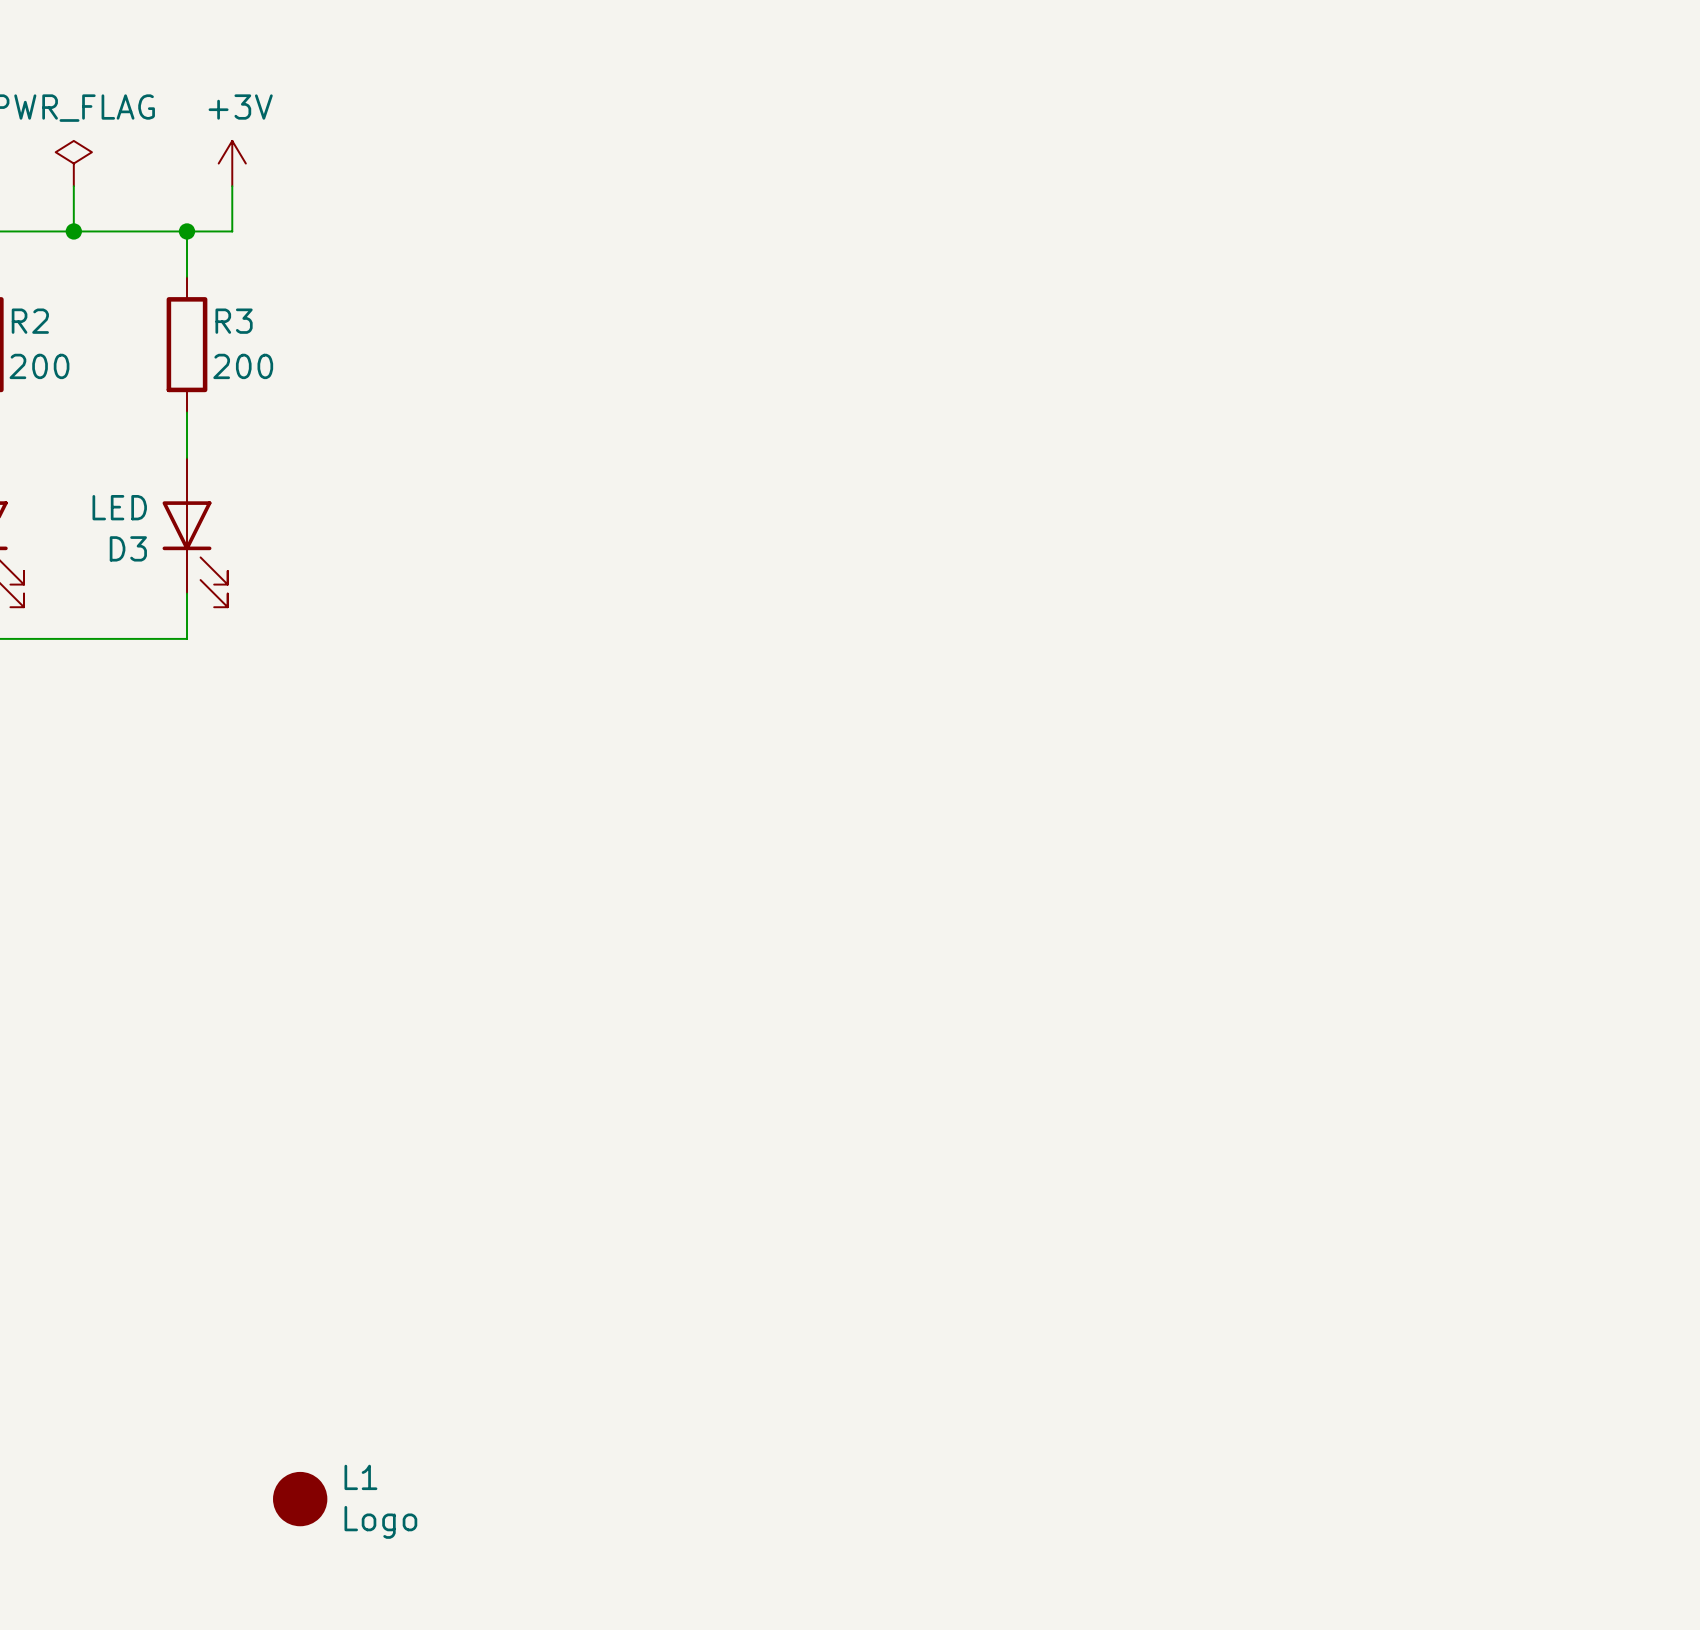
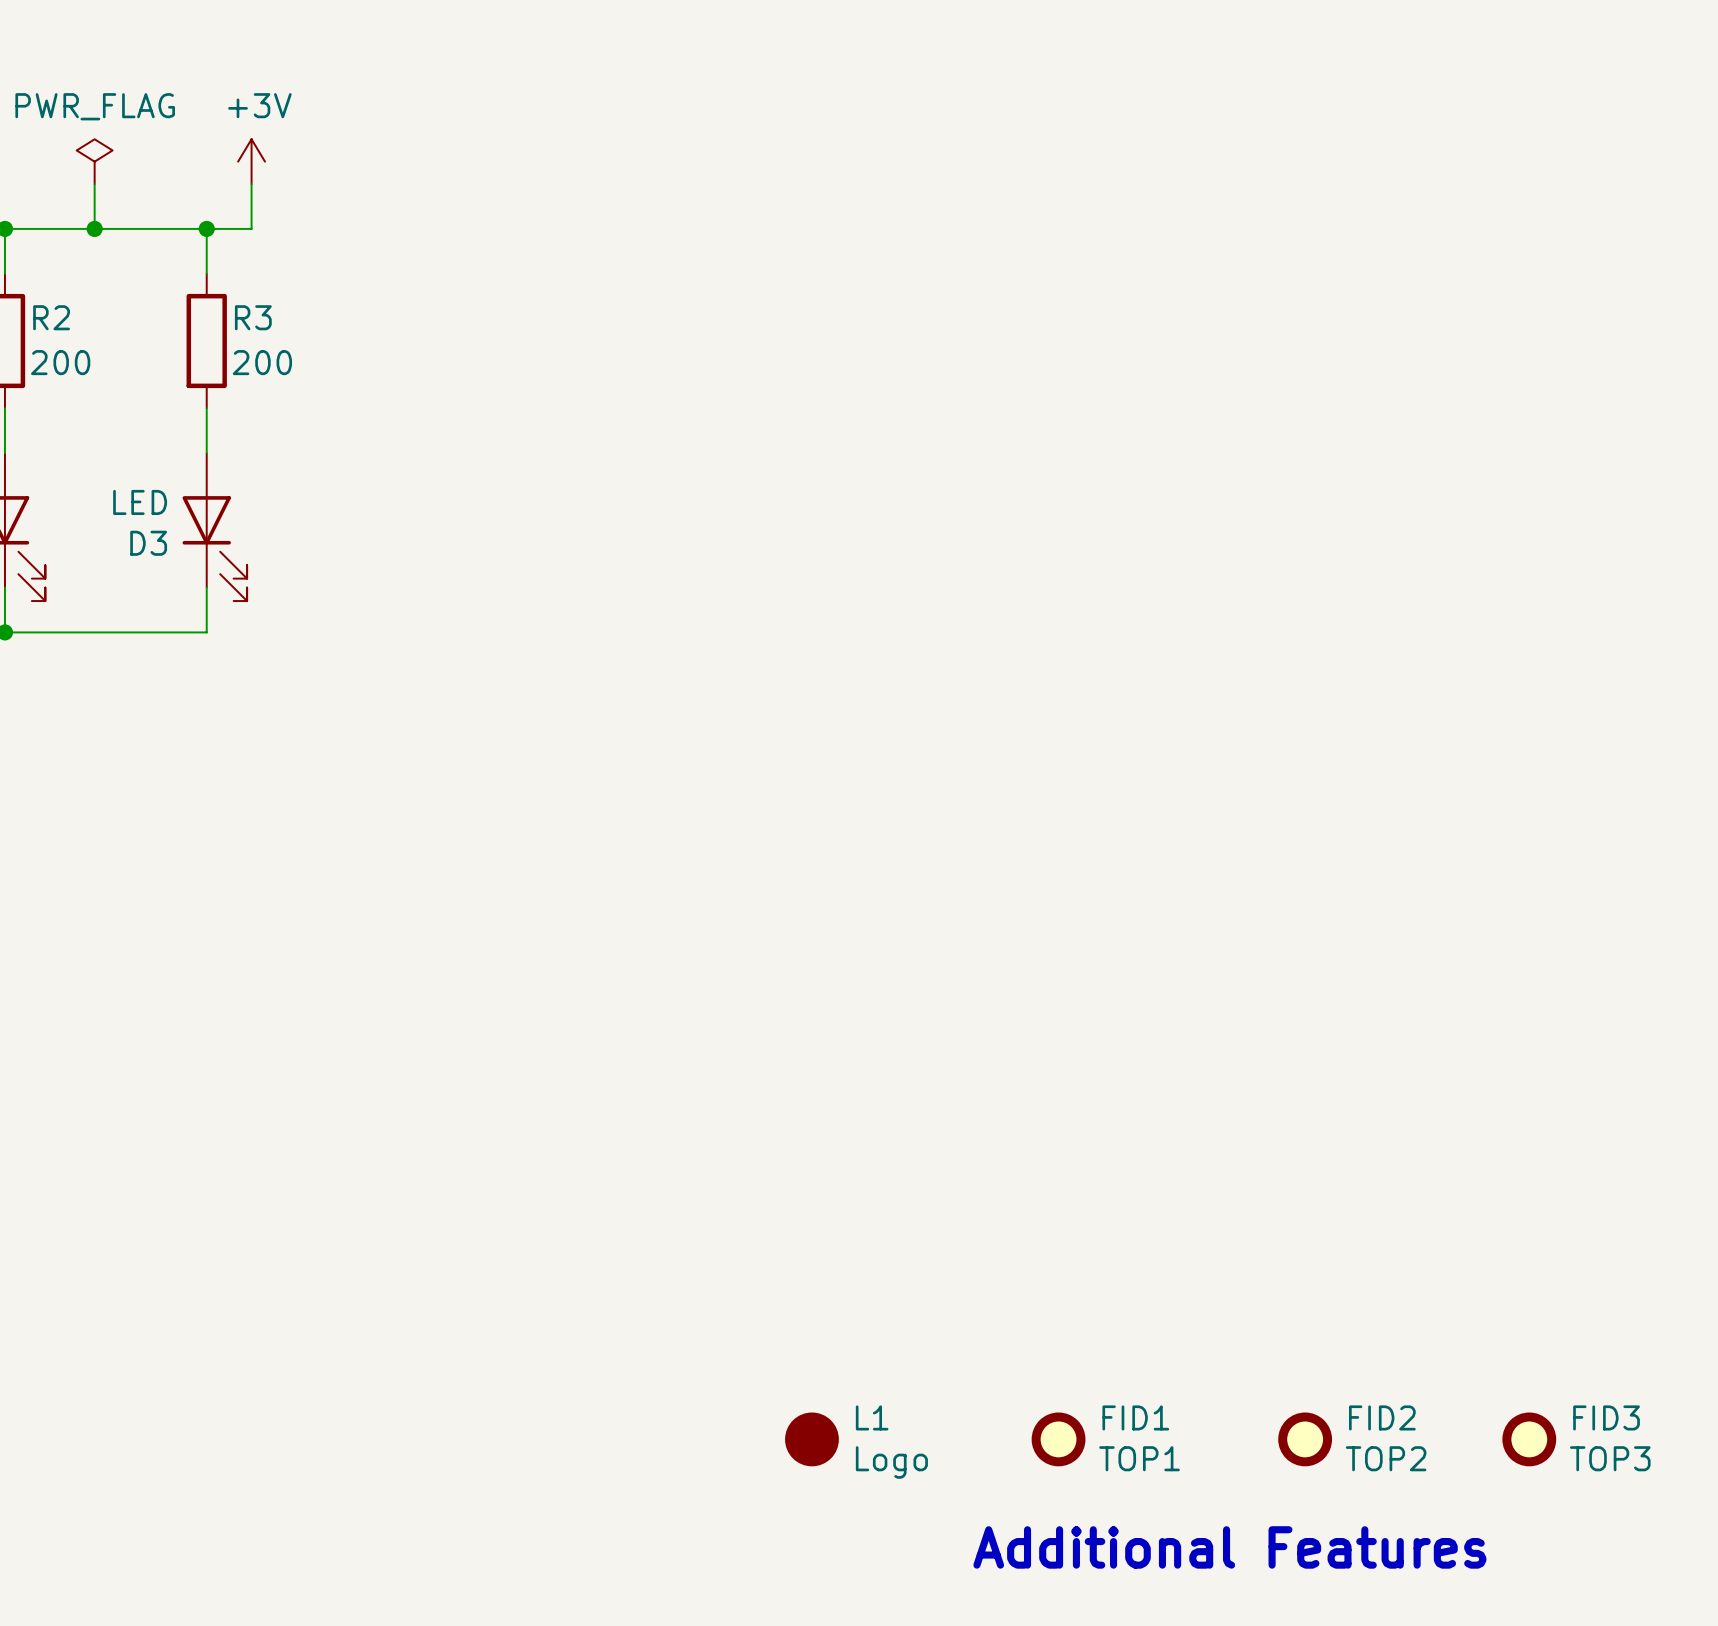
FID1: none -> (1058, 1439)
FID2: none -> (1305, 1439)
FID3: none -> (1529, 1439)
L1 position: (300, 1499) -> (811, 1439)
text: none -> Additional Features (1229, 1547)

